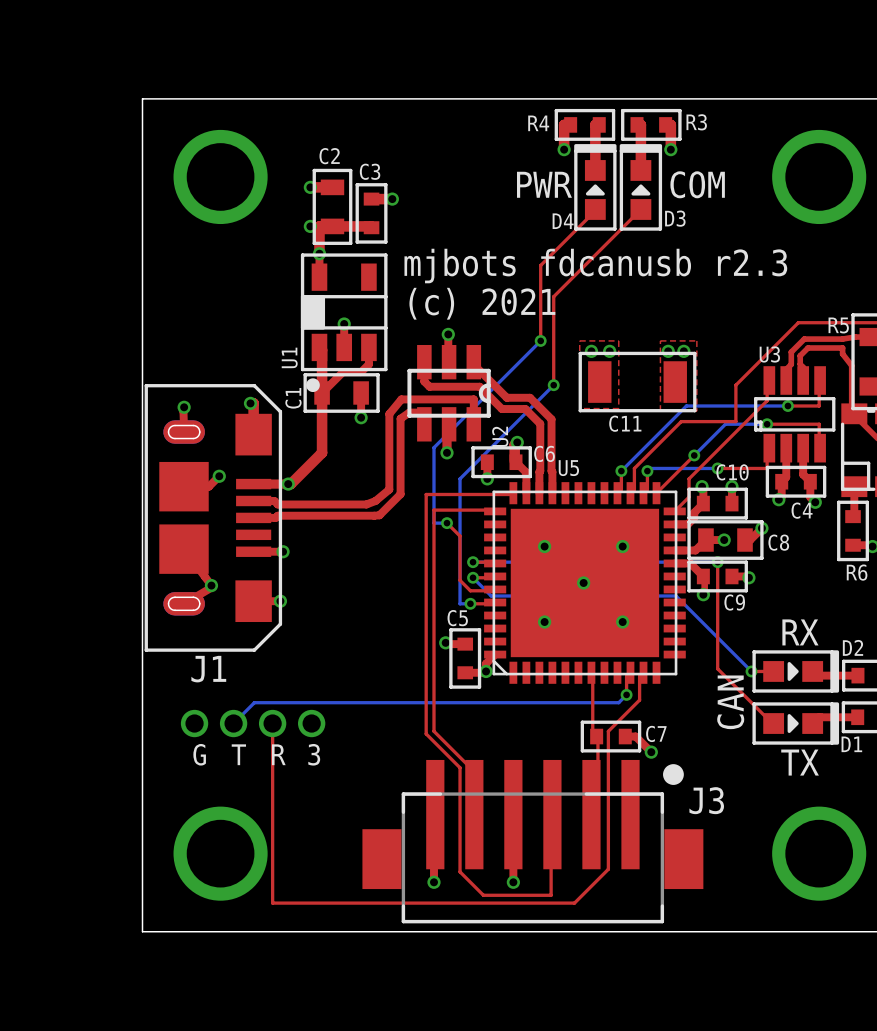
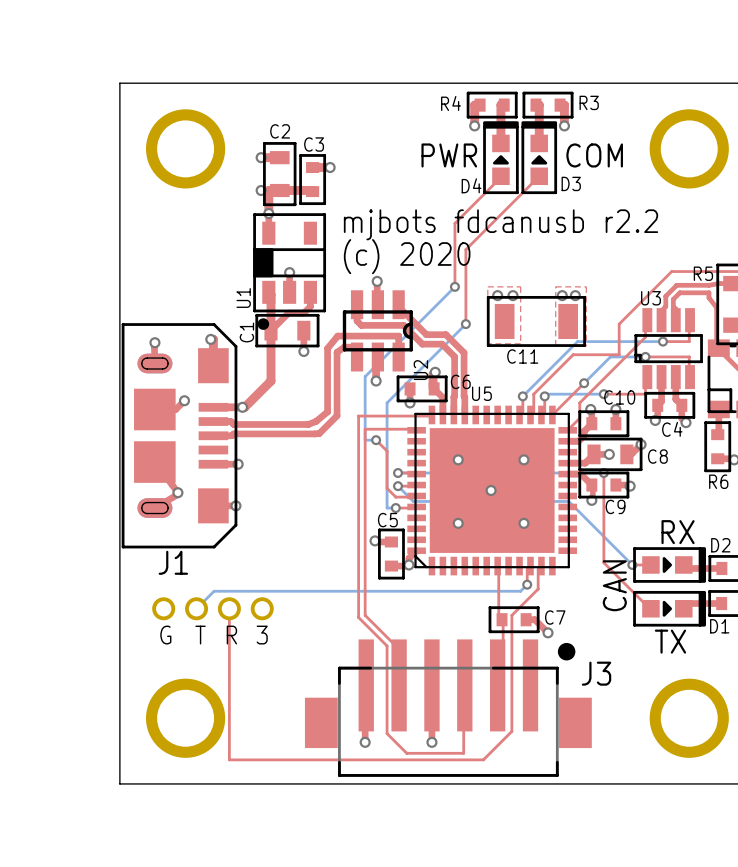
text: mjbots fdcanusb r2.3 (595, 266) -> mjbots fdcanusb r2.2 (500, 224)
text: (c) 2021 (482, 303) -> (c) 2020 (407, 256)

